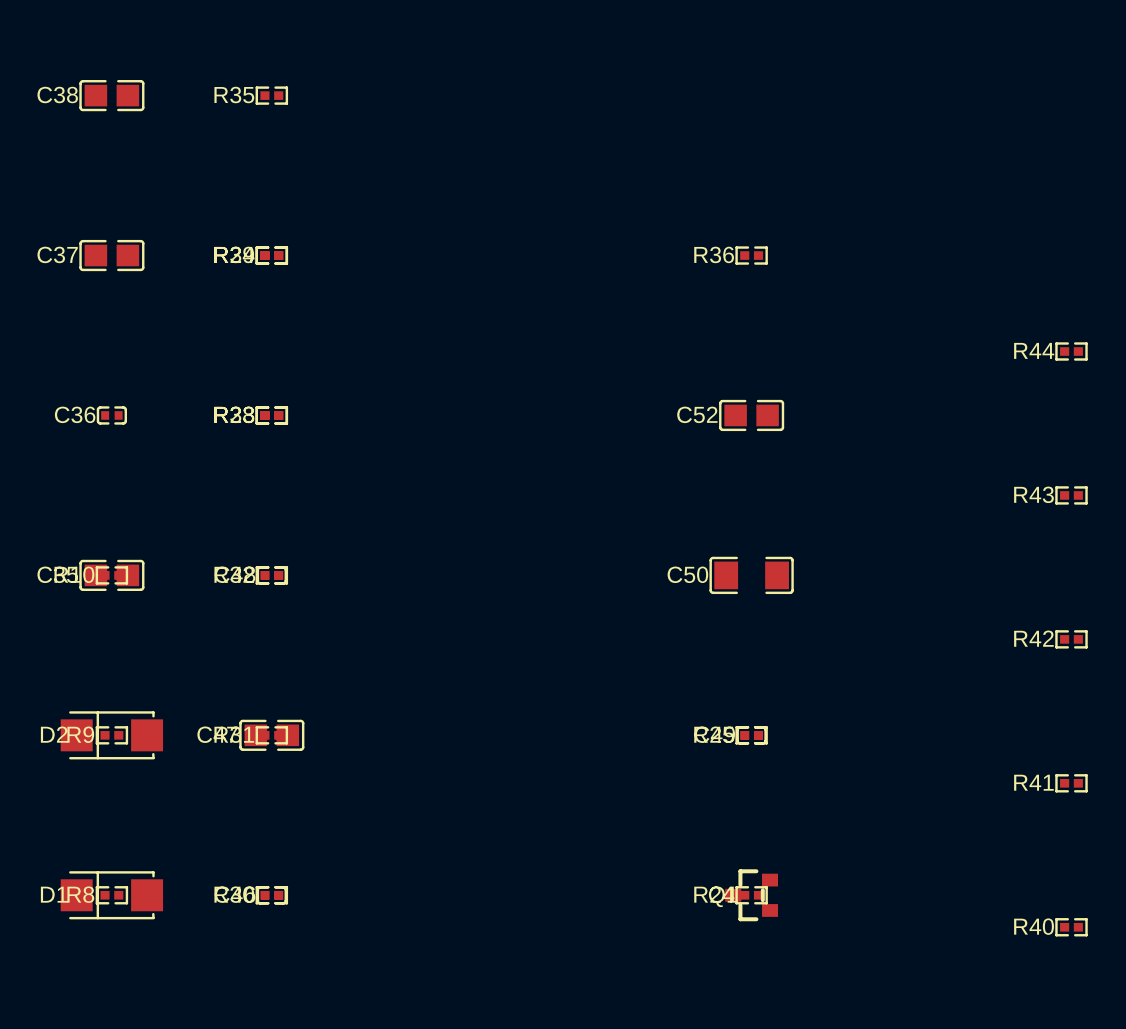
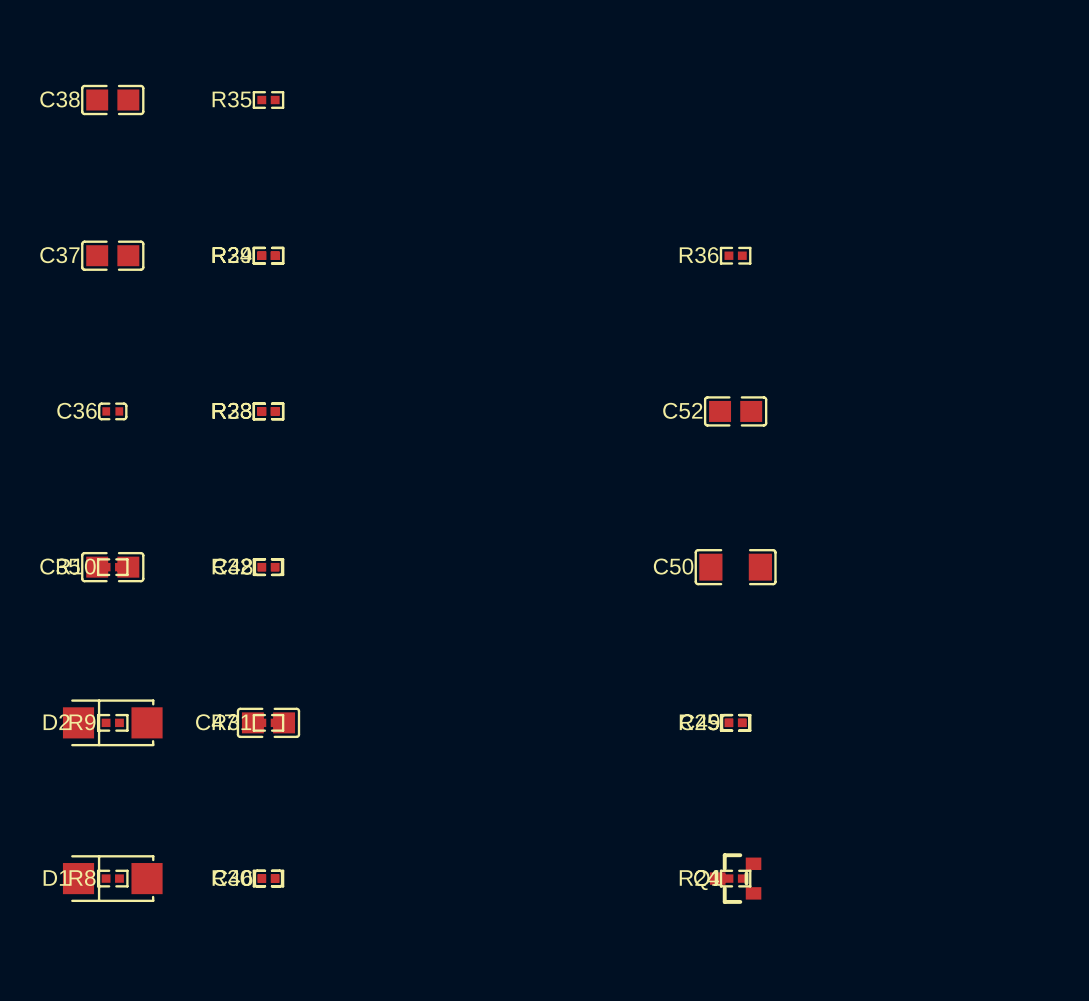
R44: (1071, 351) -> none
R43: (1071, 495) -> none
R42: (1071, 639) -> none
R41: (1071, 783) -> none
R40: (1071, 927) -> none

